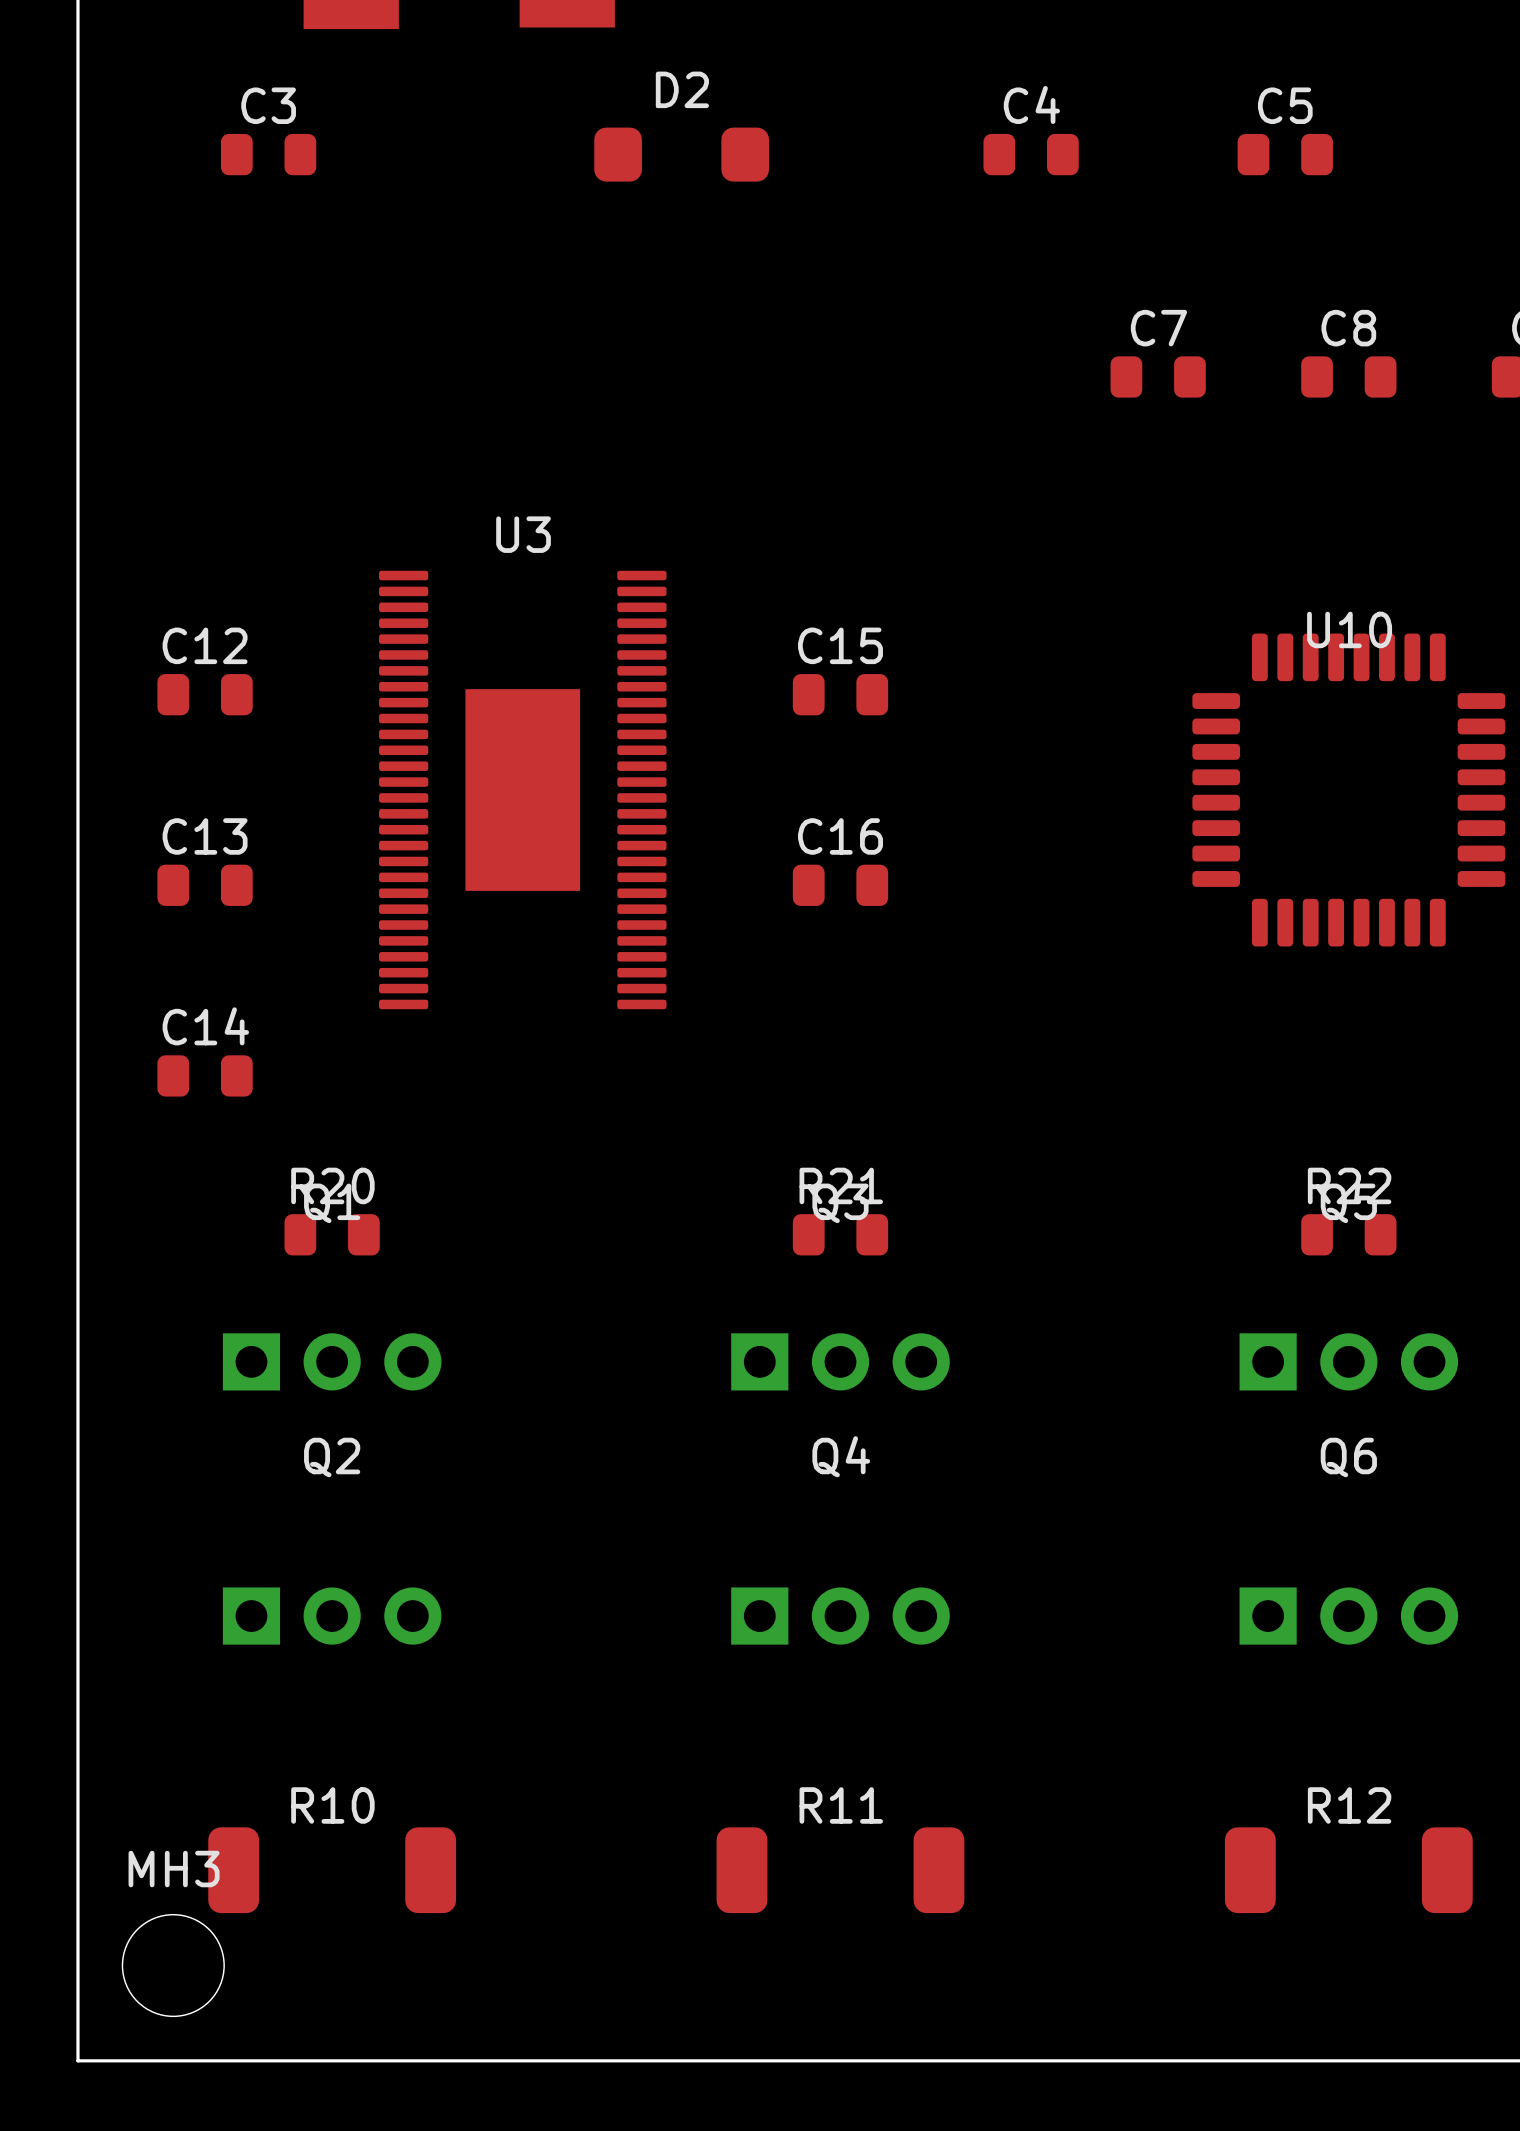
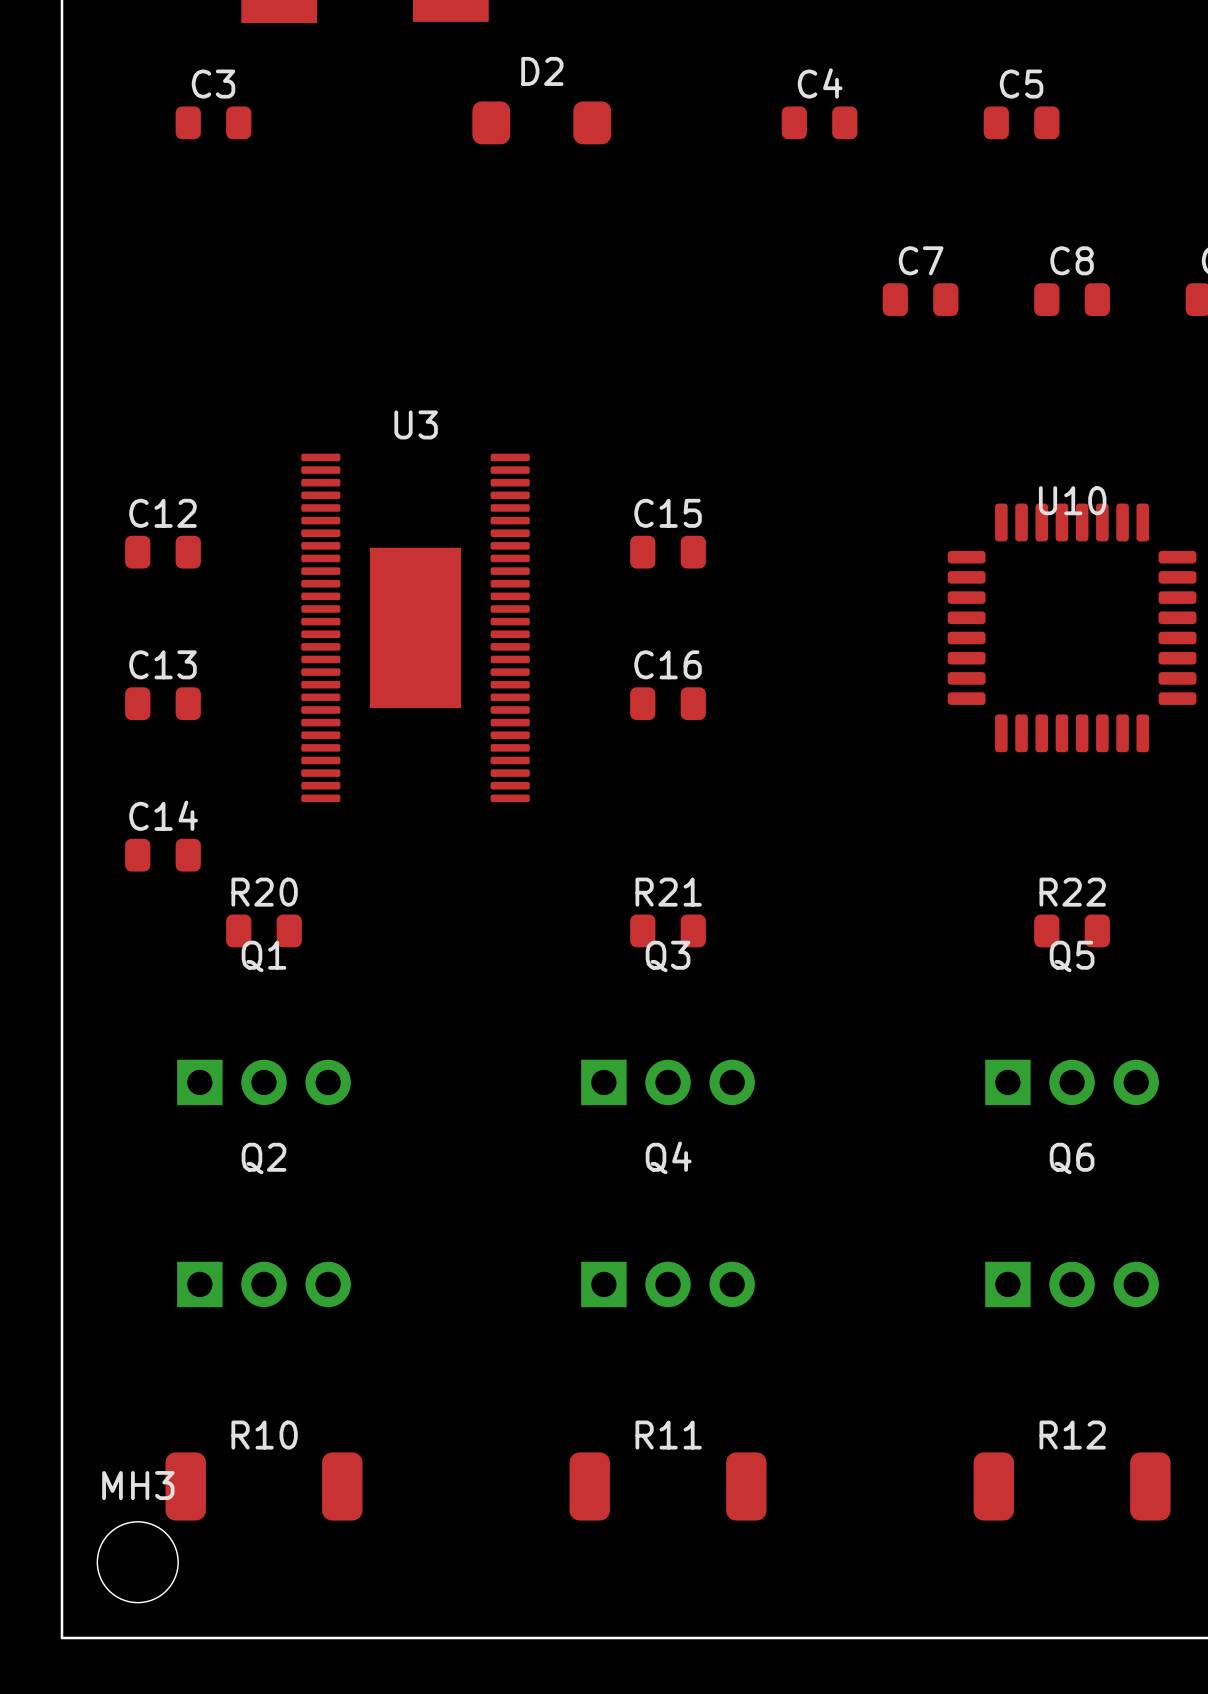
R20 position: (332, 1234) -> (264, 930)
R21 position: (840, 1234) -> (668, 930)
R22 position: (1348, 1234) -> (1072, 930)

